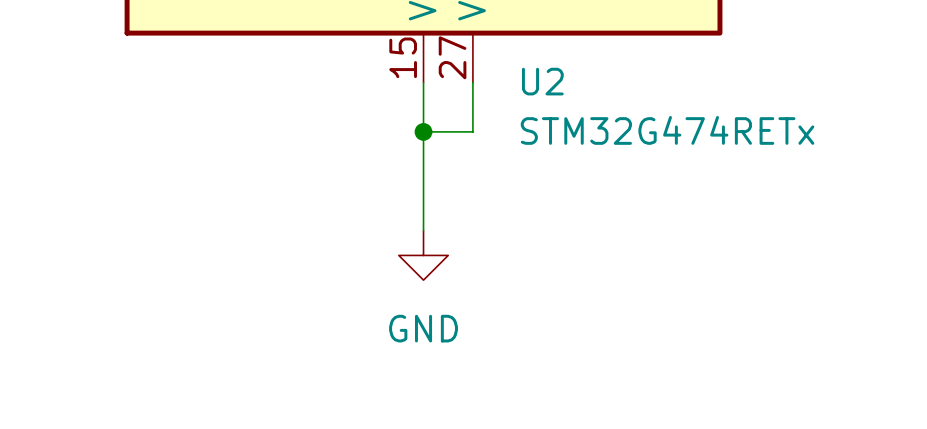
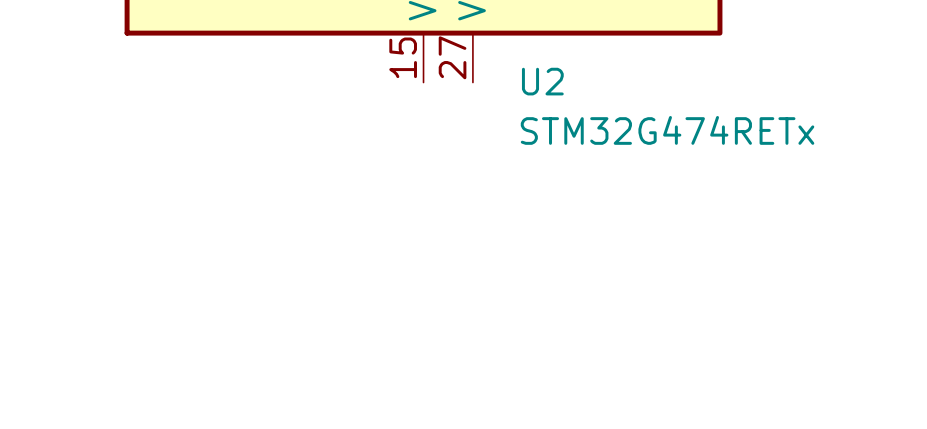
wire: (423, 82) (423, 230) -> none
wire: (472, 82) (472, 131) (423, 131) -> none
junction: (423, 131) -> none
power symbol: GND (423, 255) -> none

